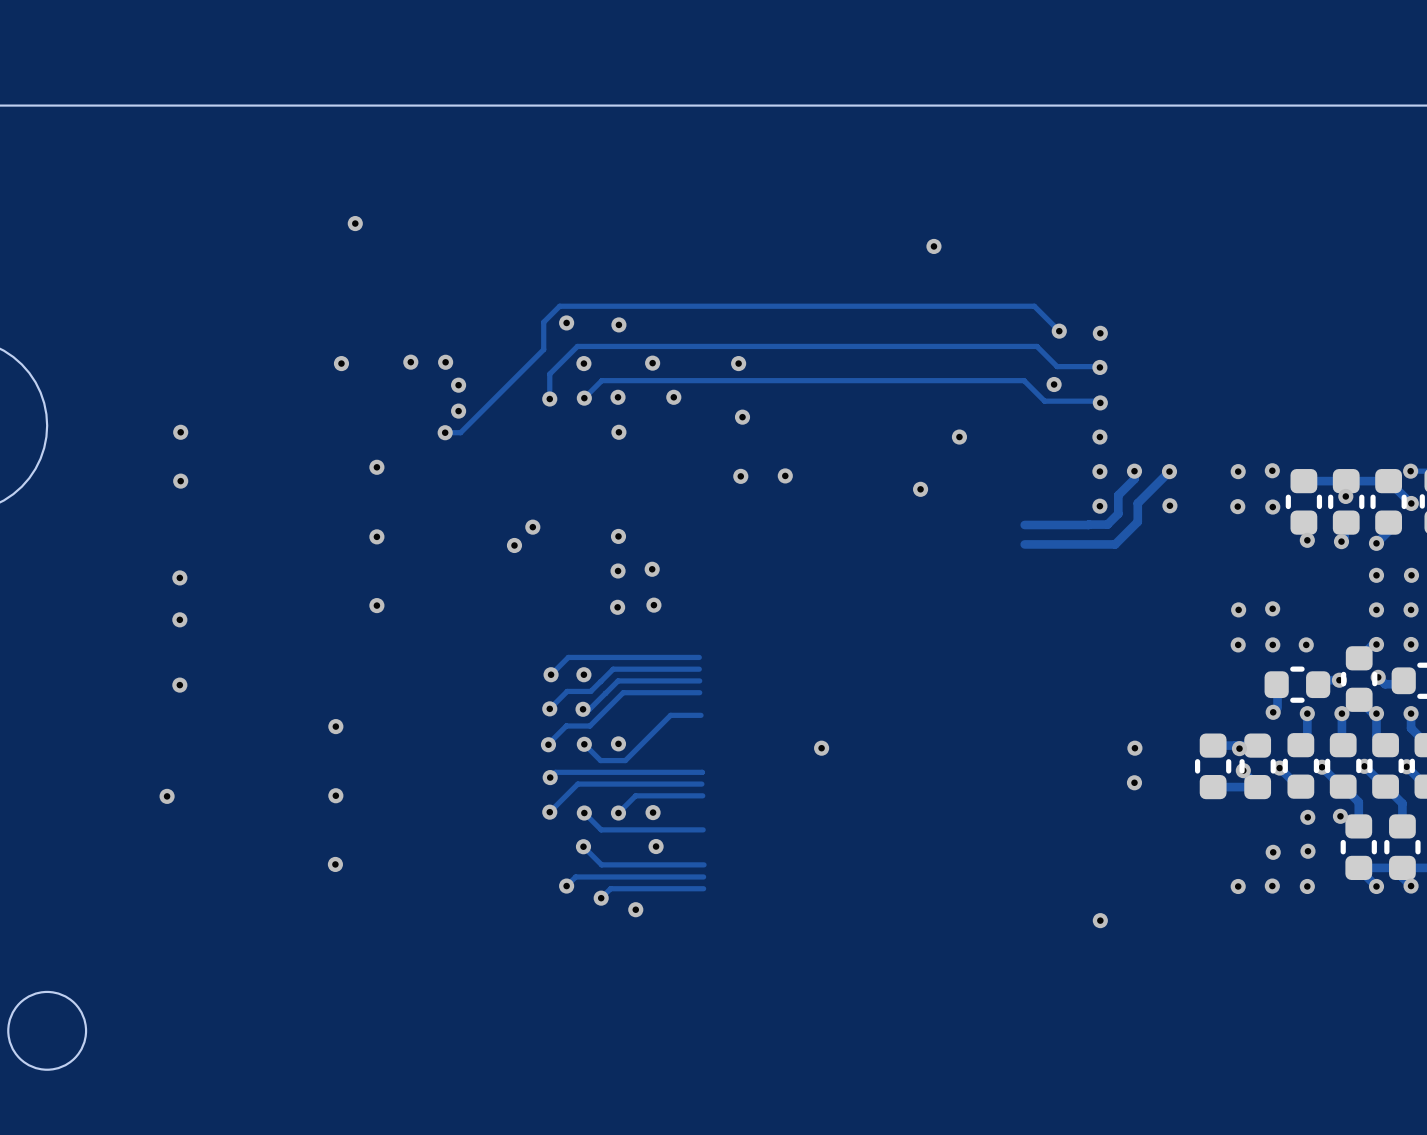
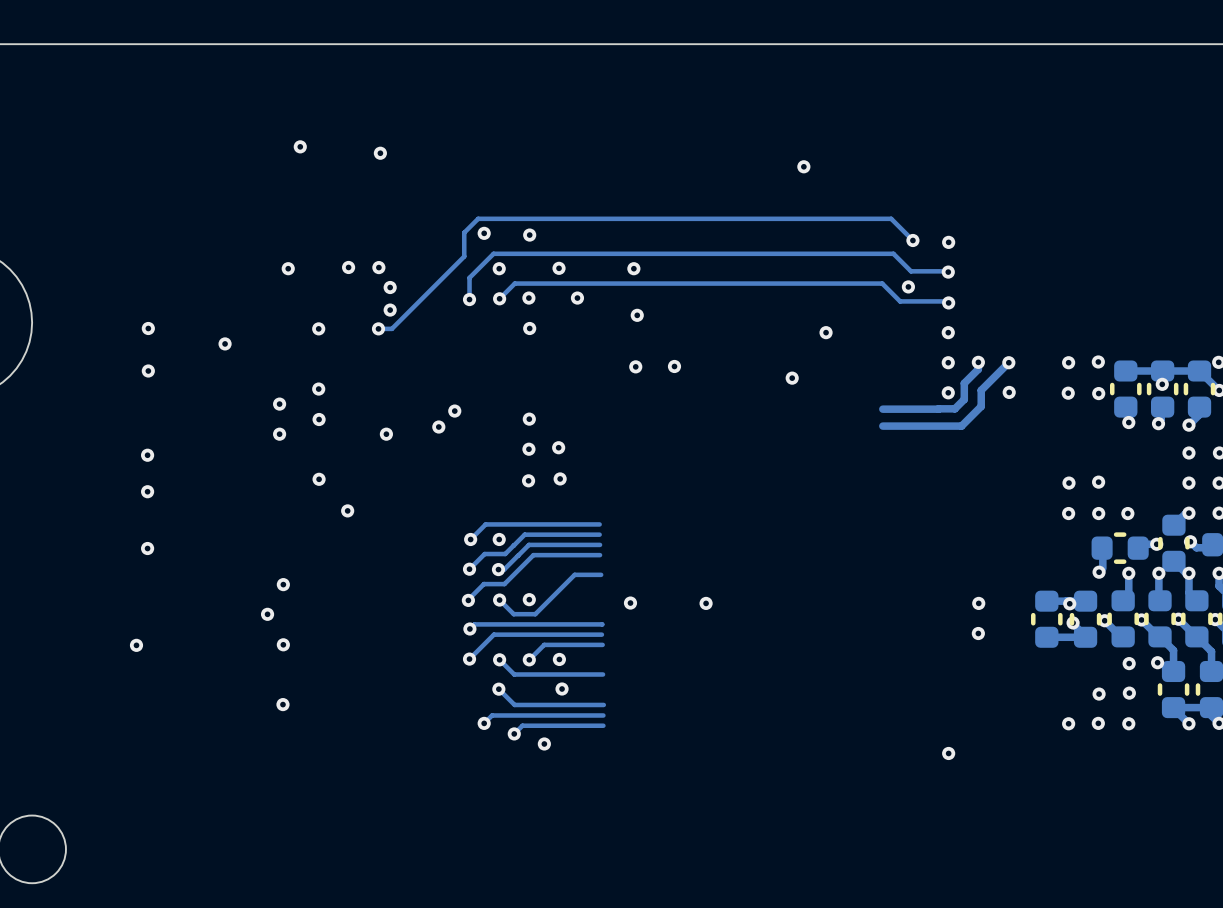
via: none -> (380, 153)
via: none -> (318, 328)
via: none -> (225, 343)
via: (376, 467) -> none
via: none -> (318, 389)
via: none -> (279, 404)
via: none -> (279, 434)
via: none -> (386, 434)
via: none -> (347, 510)
via: none -> (630, 603)
via: none -> (267, 614)

